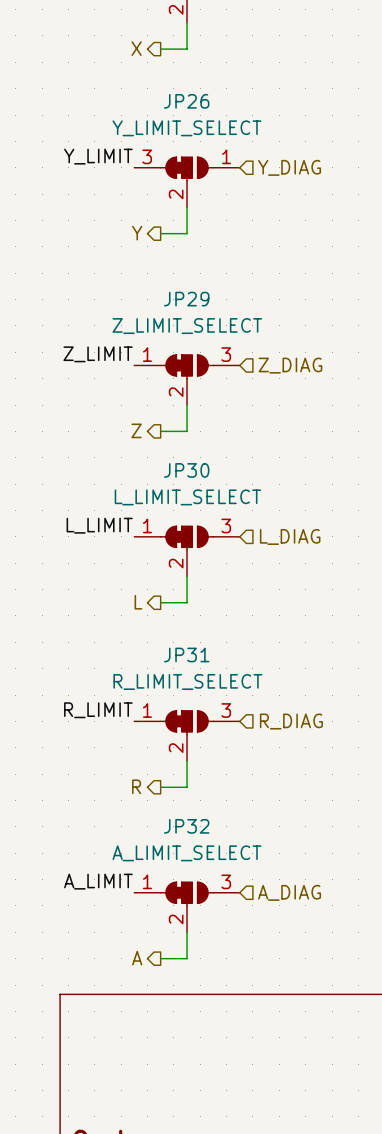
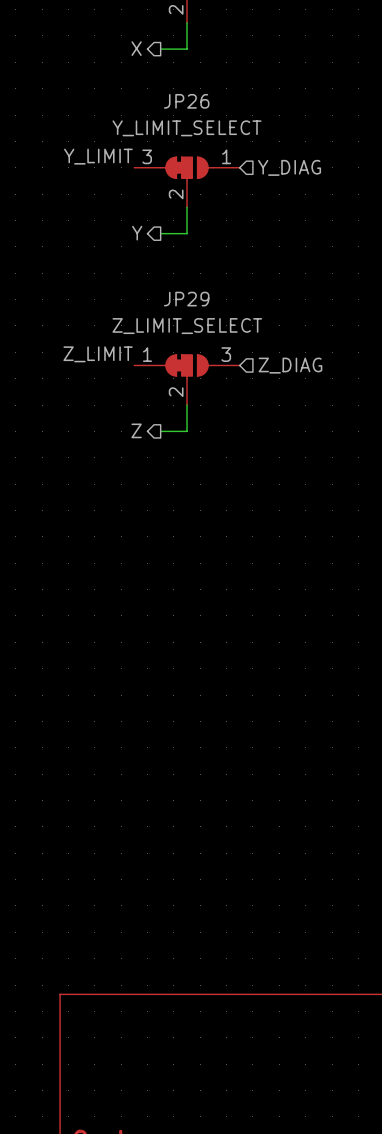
label: L_LIMIT (99, 525) -> none
hierarchical label: L_DIAG (290, 536) -> none
JP30: L_LIMIT_SELECT (187, 551) -> none
wire: (187, 576) (187, 602) (160, 602) -> none
hierarchical label: L (138, 602) -> none
label: R_LIMIT (98, 710) -> none
hierarchical label: R_DIAG (291, 721) -> none
JP31: R_LIMIT_SELECT (187, 735) -> none
wire: (187, 760) (187, 787) (160, 787) -> none
hierarchical label: R (136, 786) -> none
label: A_LIMIT (98, 881) -> none
hierarchical label: A_DIAG (289, 892) -> none
JP32: A_LIMIT_SELECT (187, 907) -> none
wire: (187, 932) (187, 958) (160, 958) -> none
hierarchical label: A (137, 958) -> none

